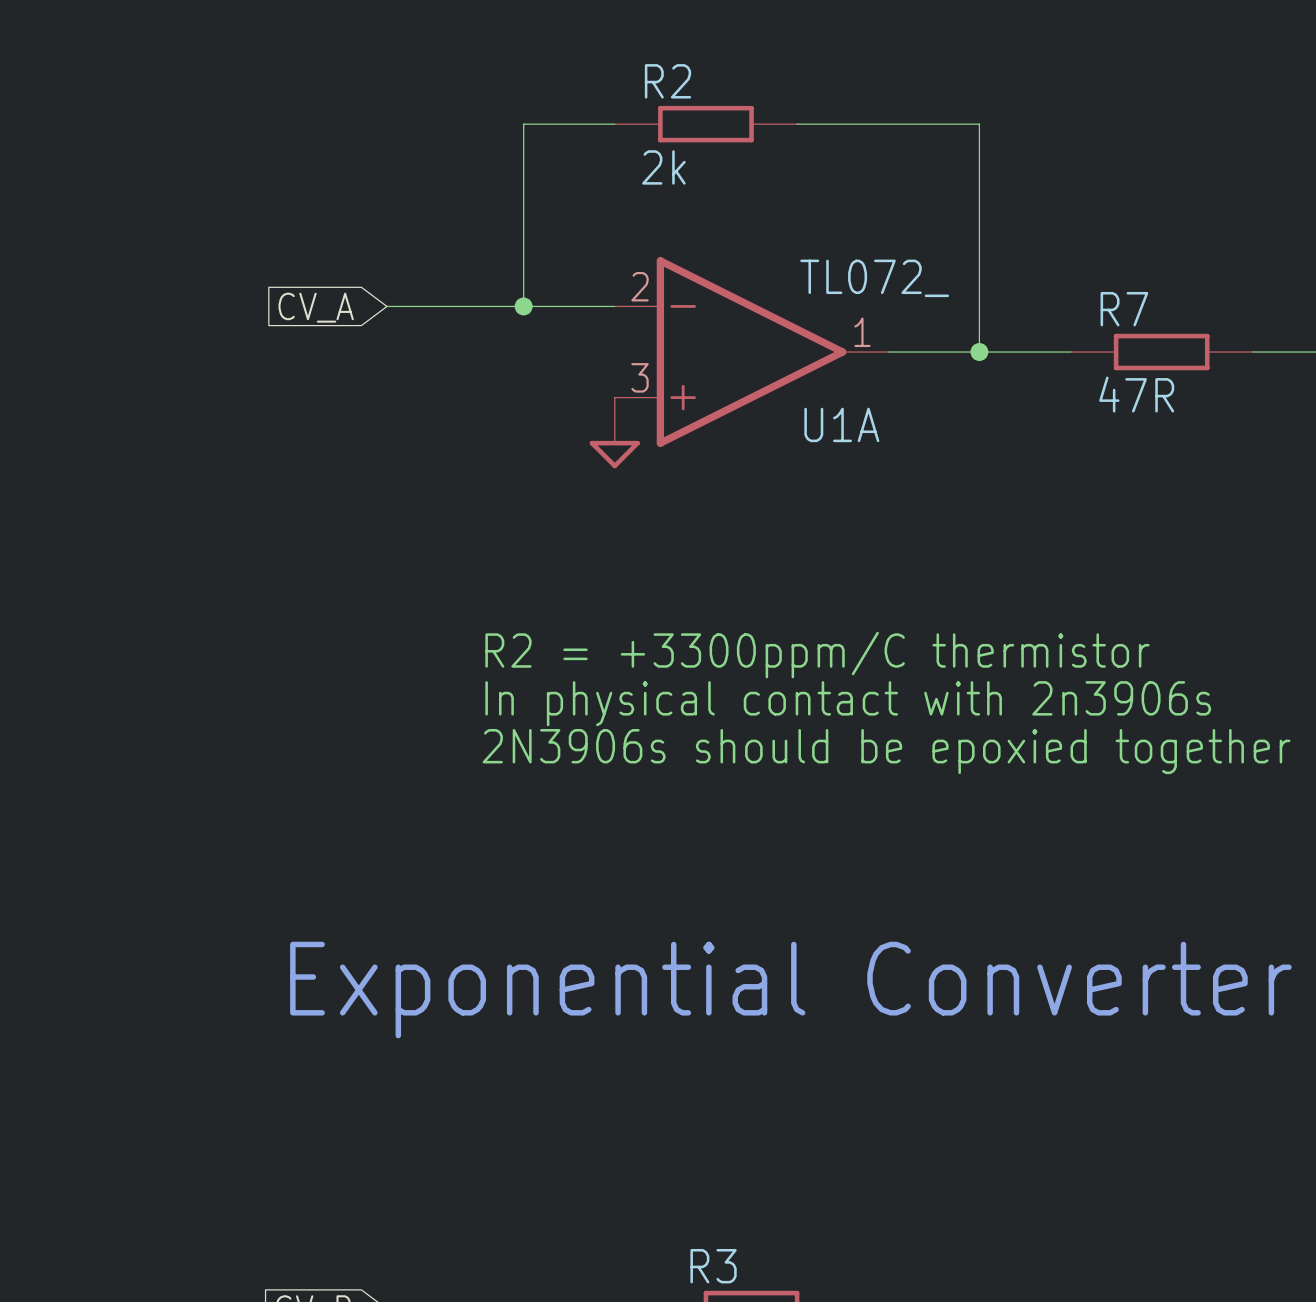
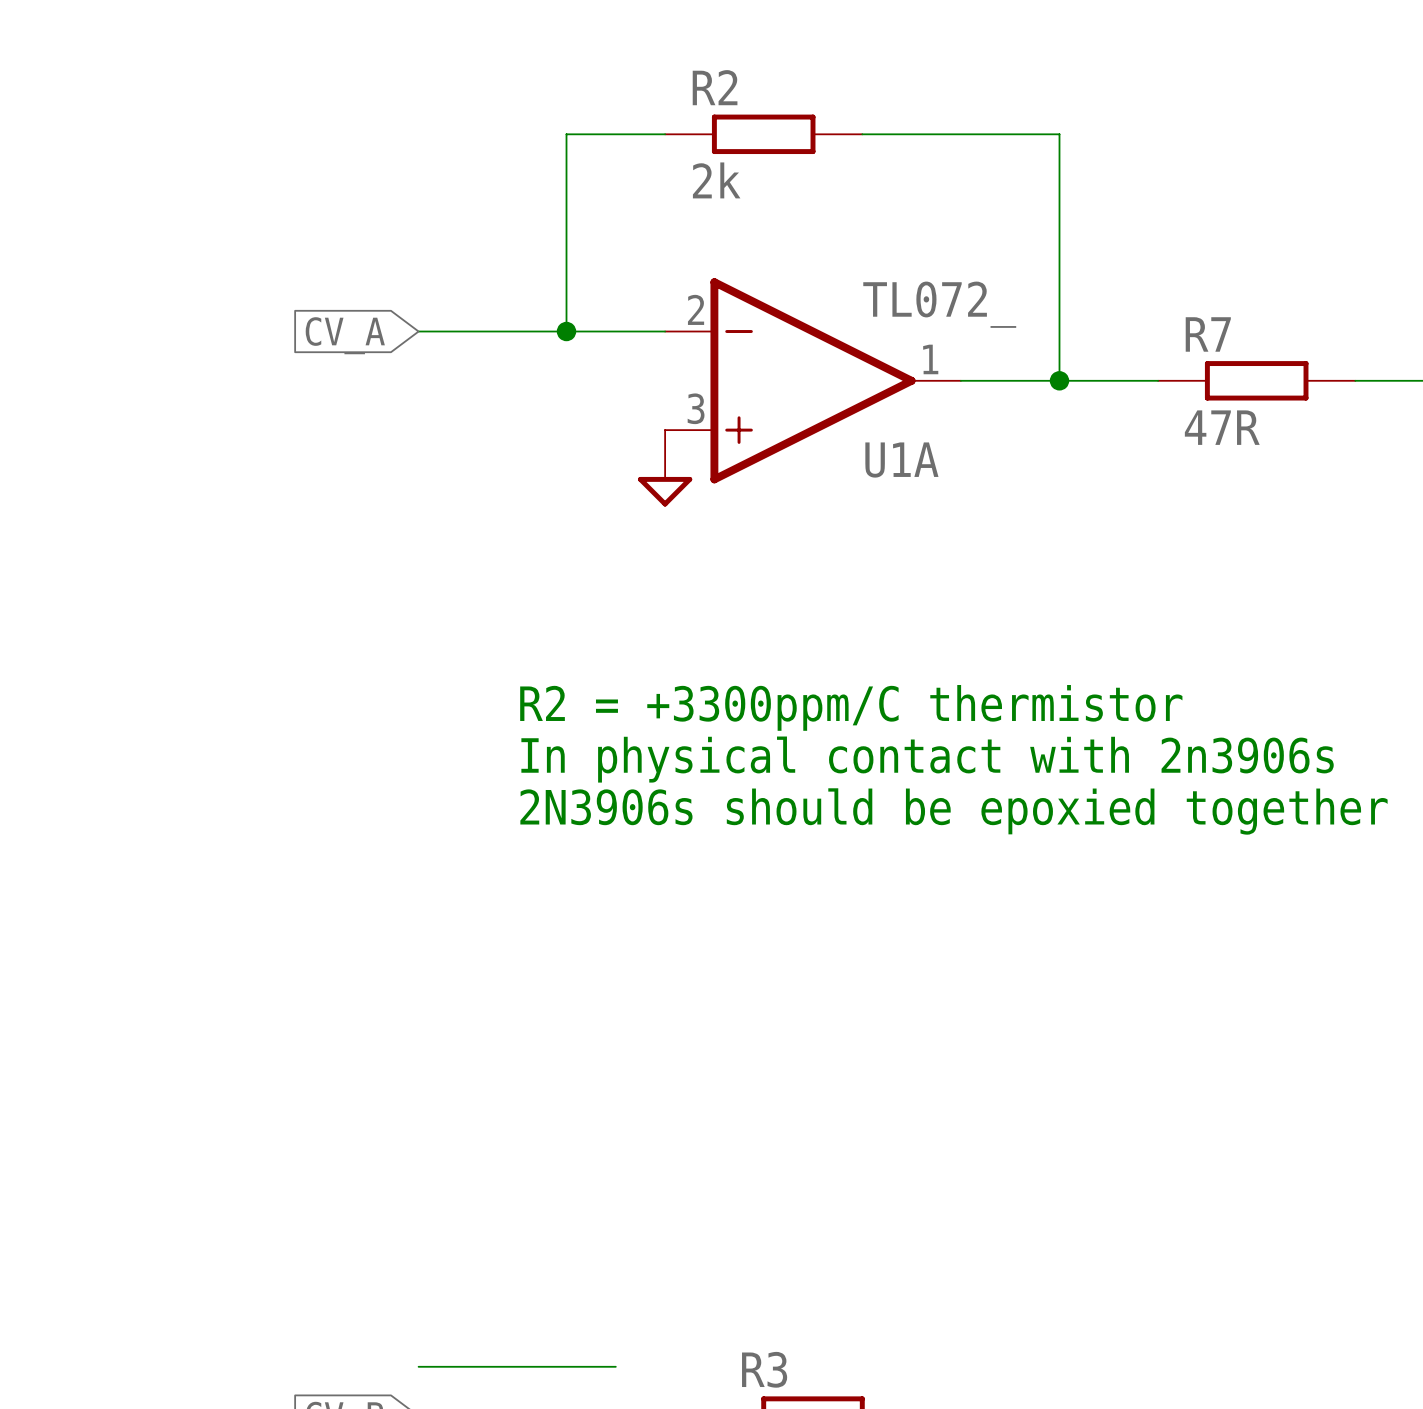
text: Exponential Converter (790, 990) -> none
wire: none -> (418, 1366) (615, 1366)

